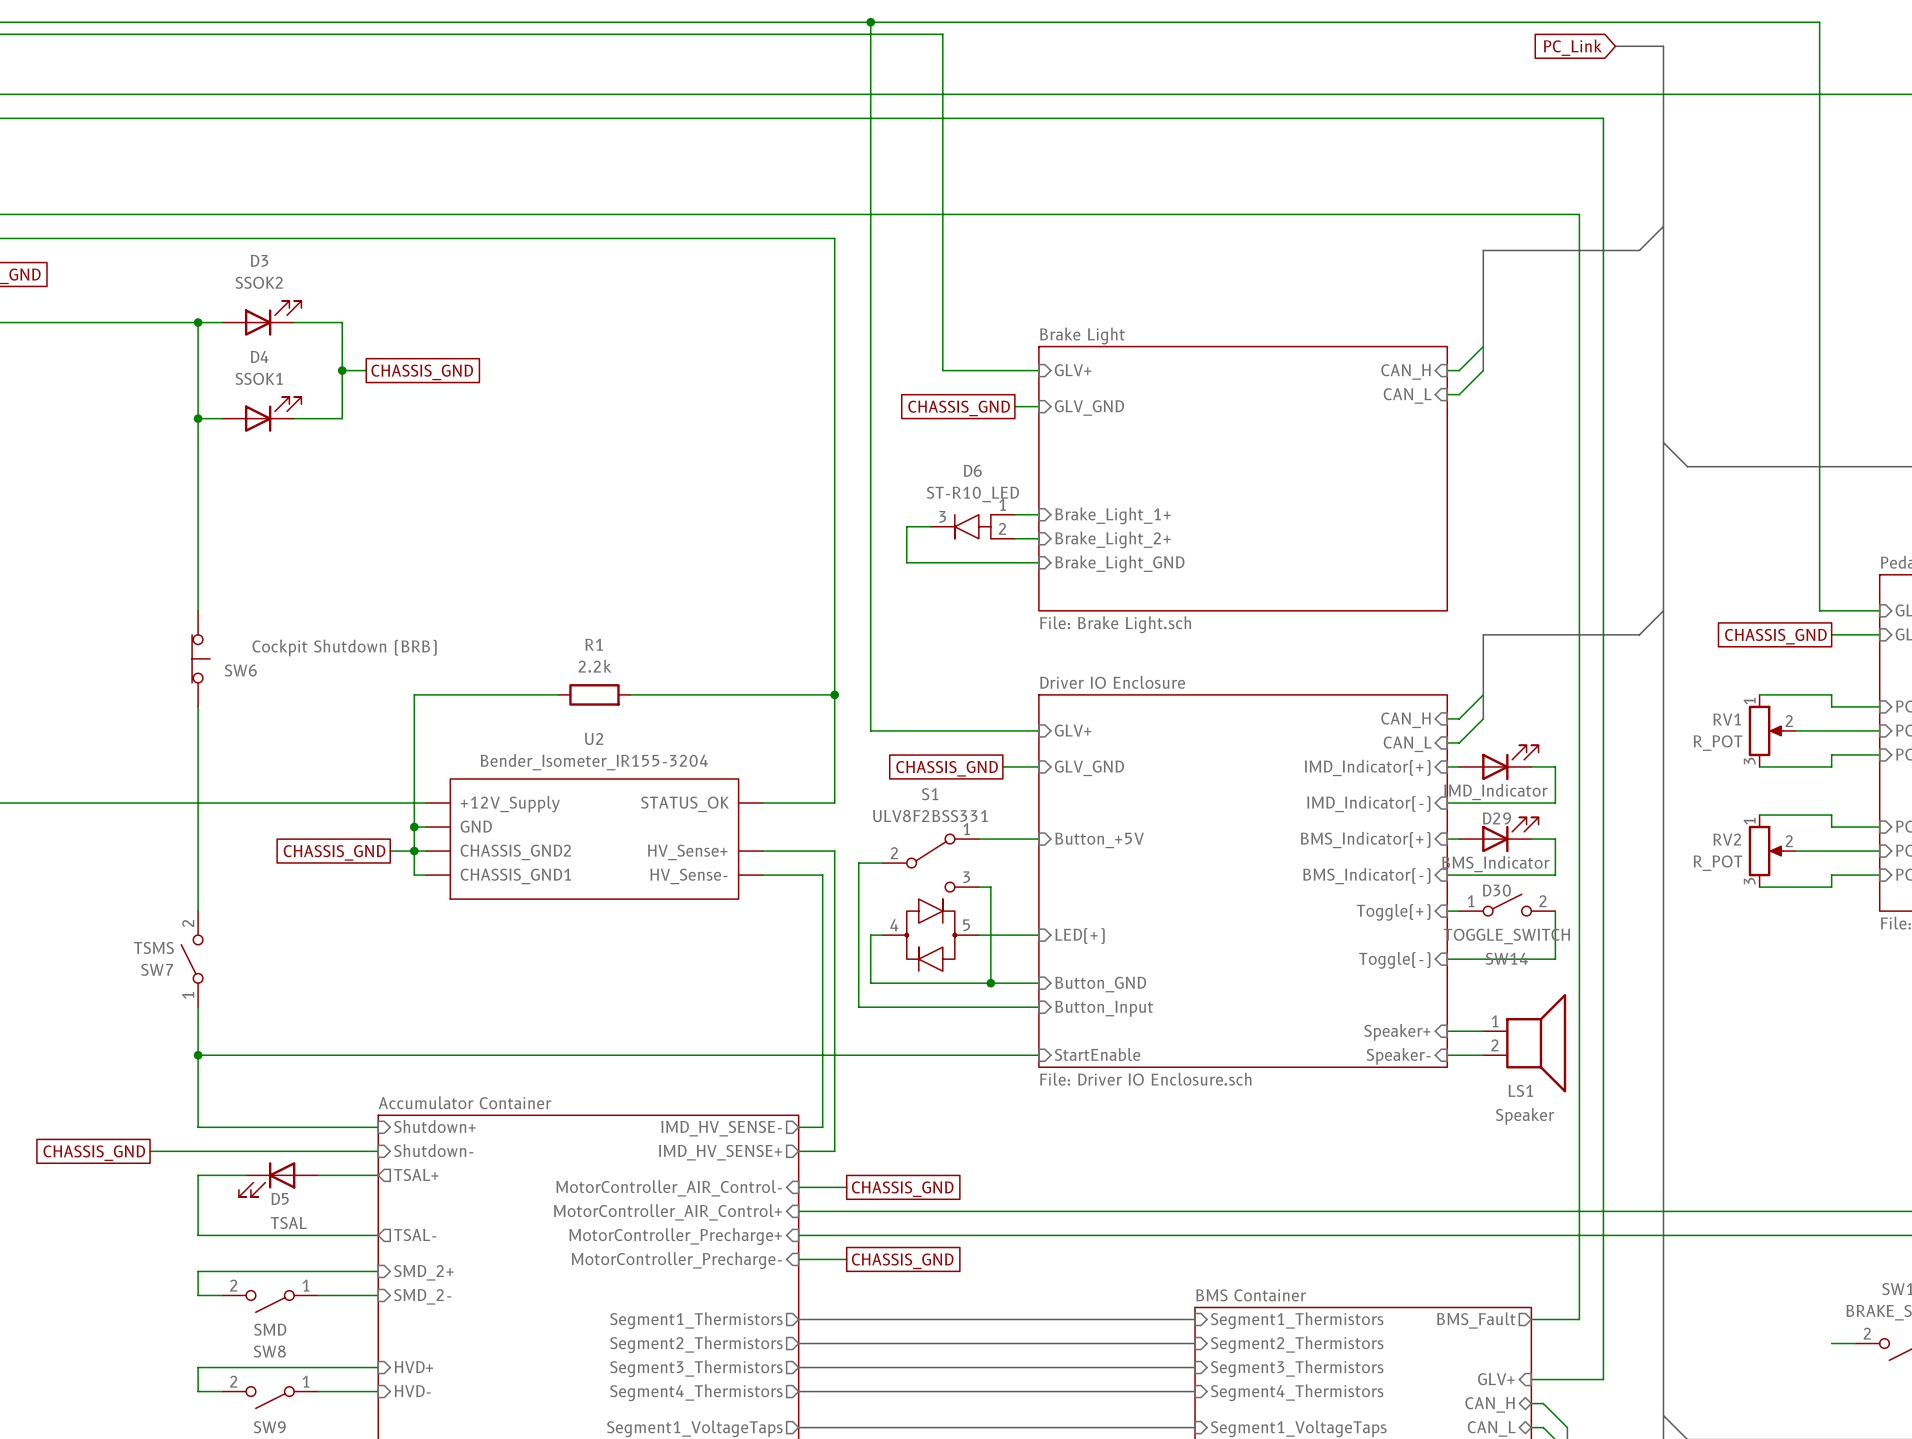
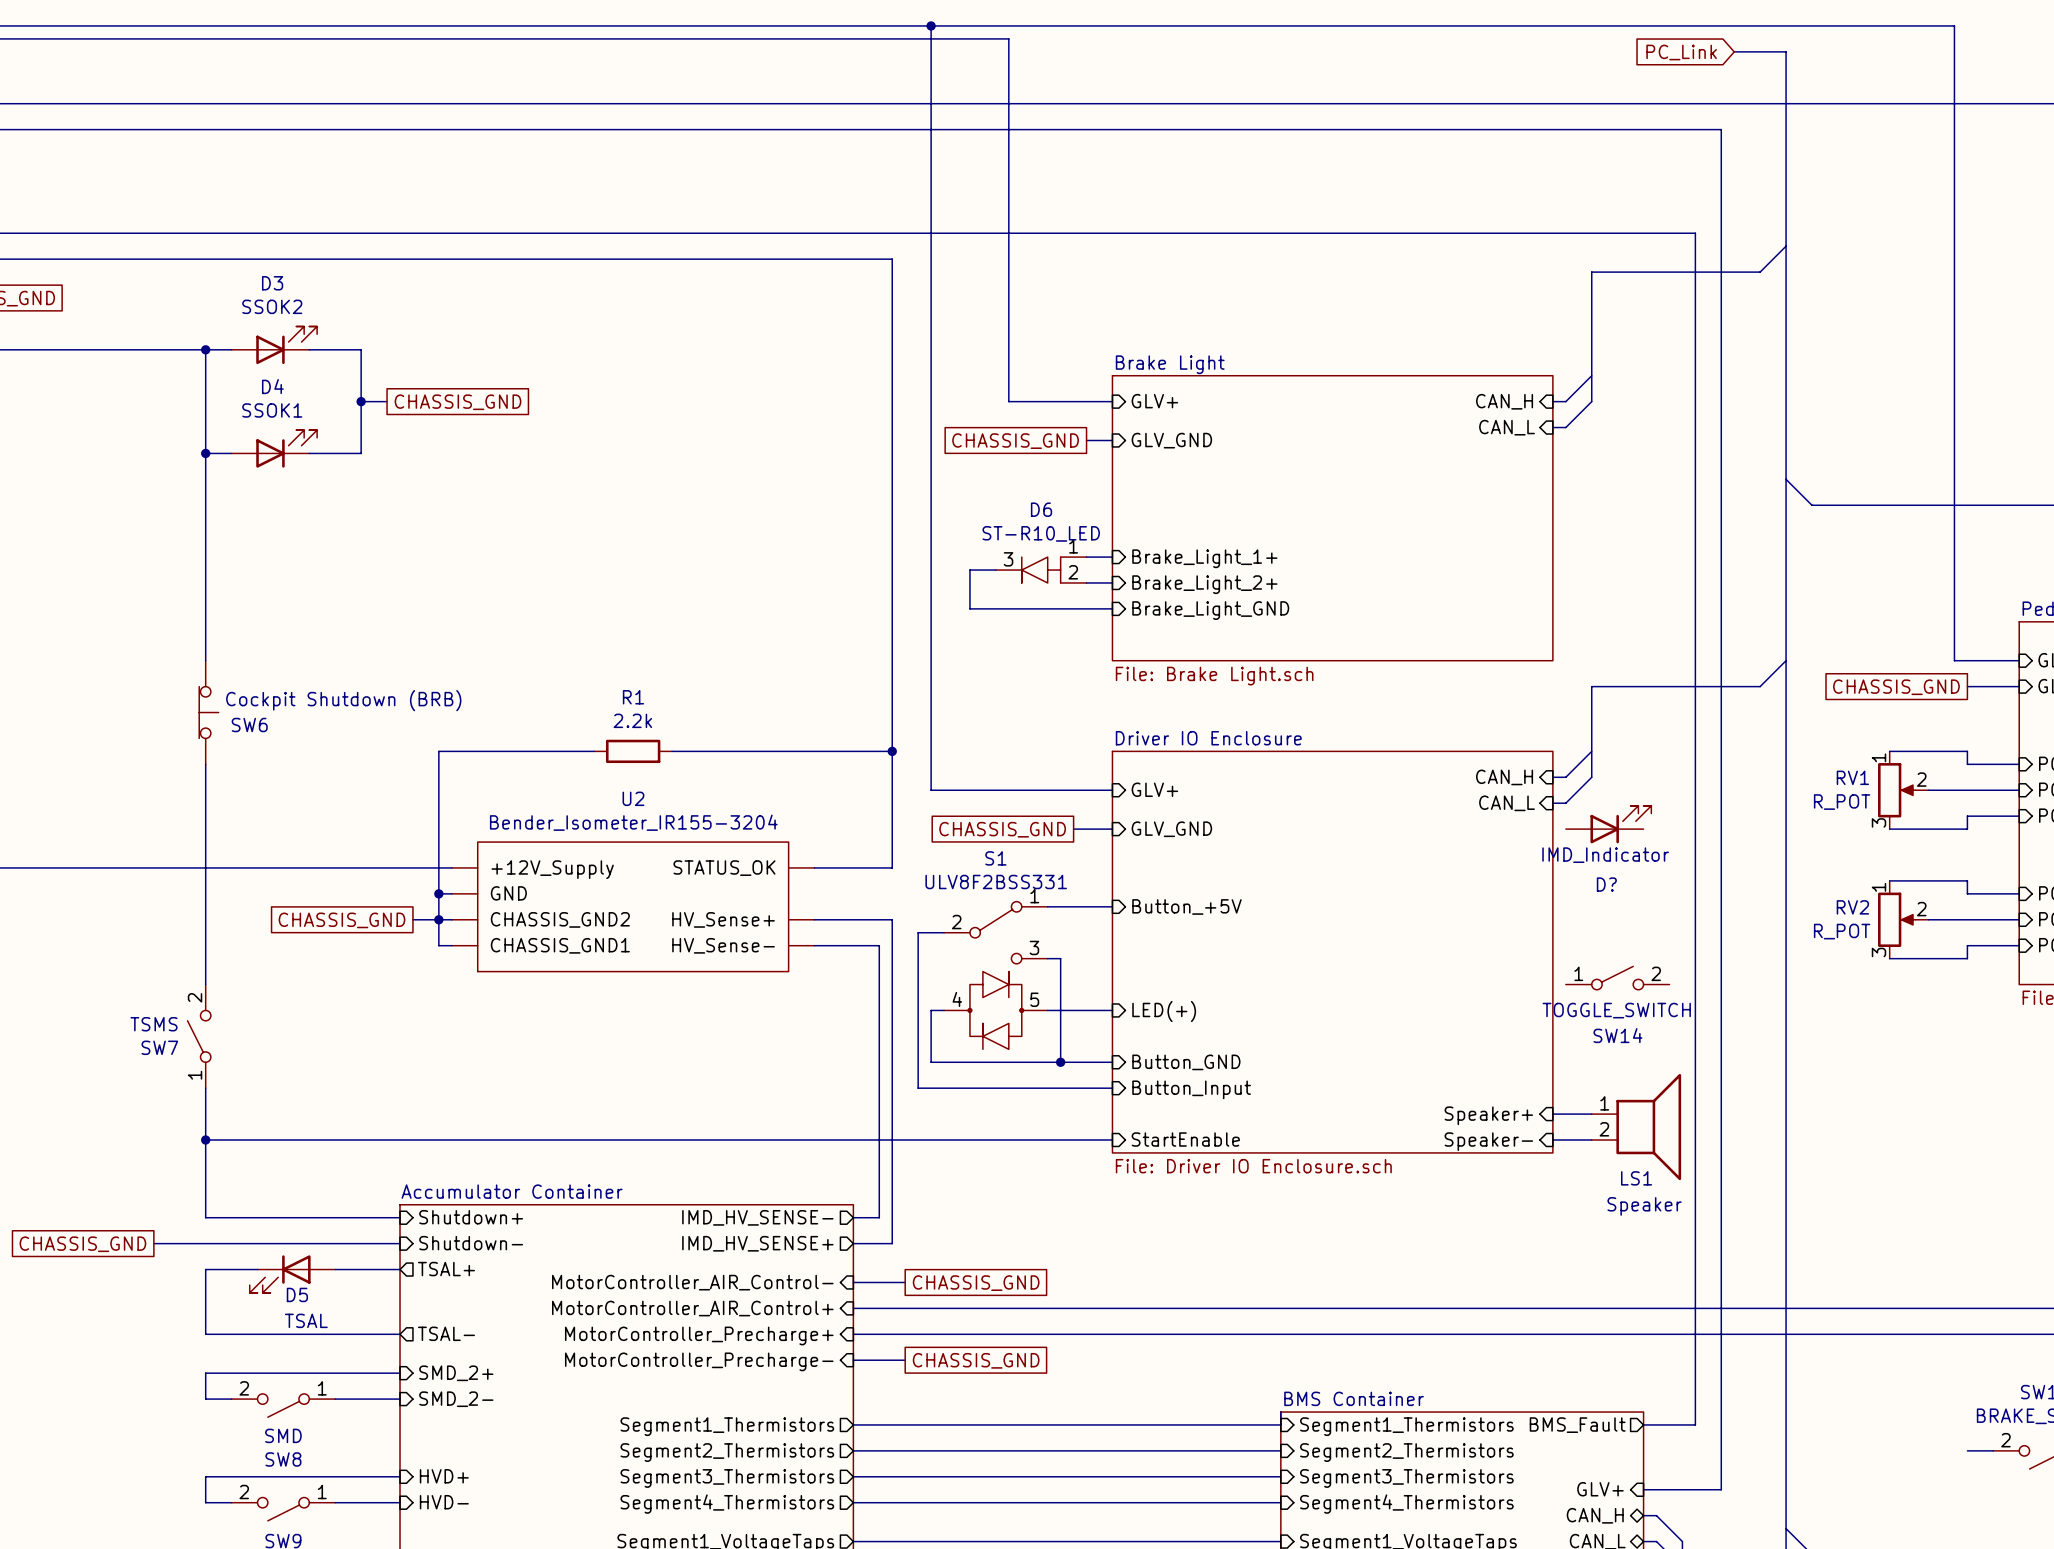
wire: (1447, 766) (1459, 766) -> none
wire: (1531, 766) (1555, 766) (1555, 803) (1447, 803) -> none
sheet pin: IMD_Indicator(+) (1367, 767) -> none
sheet pin: IMD_Indicator(-) (1368, 803) -> none
D29 name: D29 (1496, 818) -> D? (1606, 884)
D30: BMS_Indicator (1498, 834) -> none
sheet pin: BMS_Indicator(+) (1365, 839) -> none
wire: (1447, 839) (1459, 839) -> none
wire: (1531, 839) (1555, 839) (1555, 875) (1447, 875) -> none
sheet pin: BMS_Indicator(-) (1366, 876) -> none
wire: (1447, 911) (1459, 911) -> none
wire: (1555, 911) (1555, 959) (1447, 959) -> none
sheet pin: Toggle(+) (1393, 912) -> none
sheet pin: Toggle(-) (1394, 960) -> none

